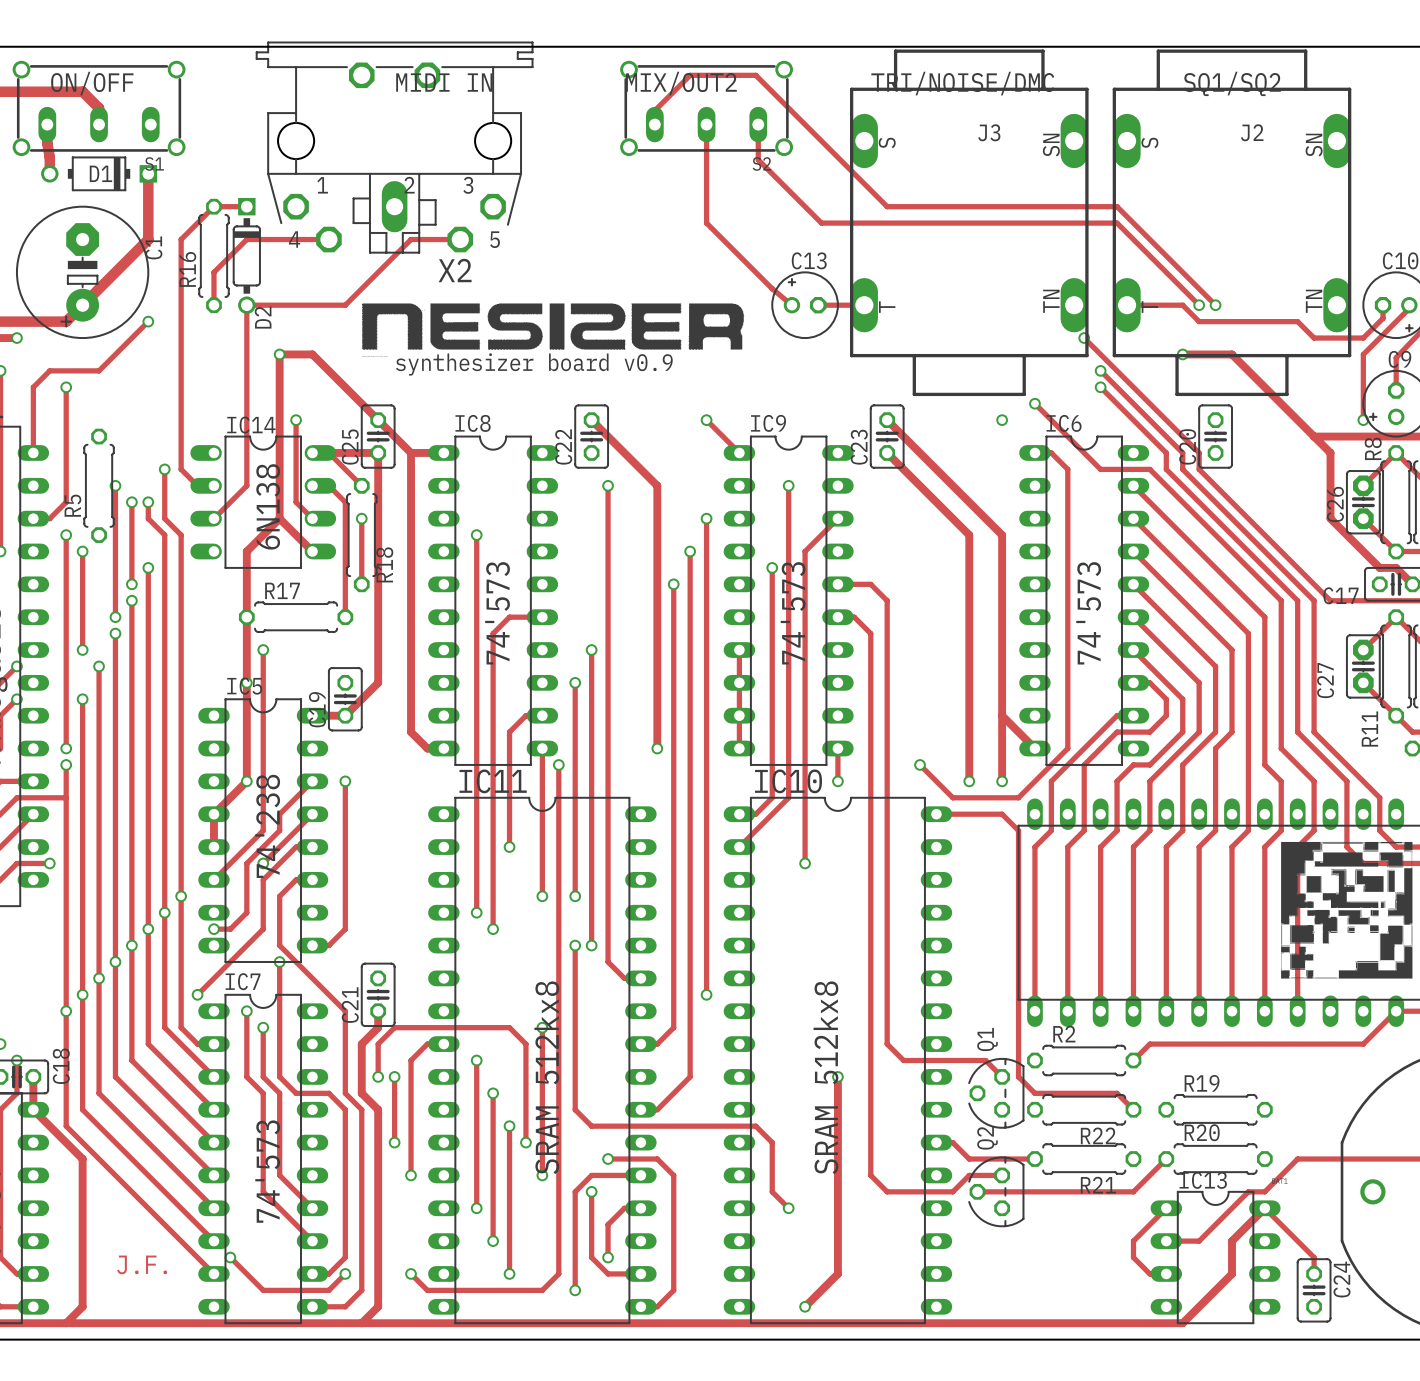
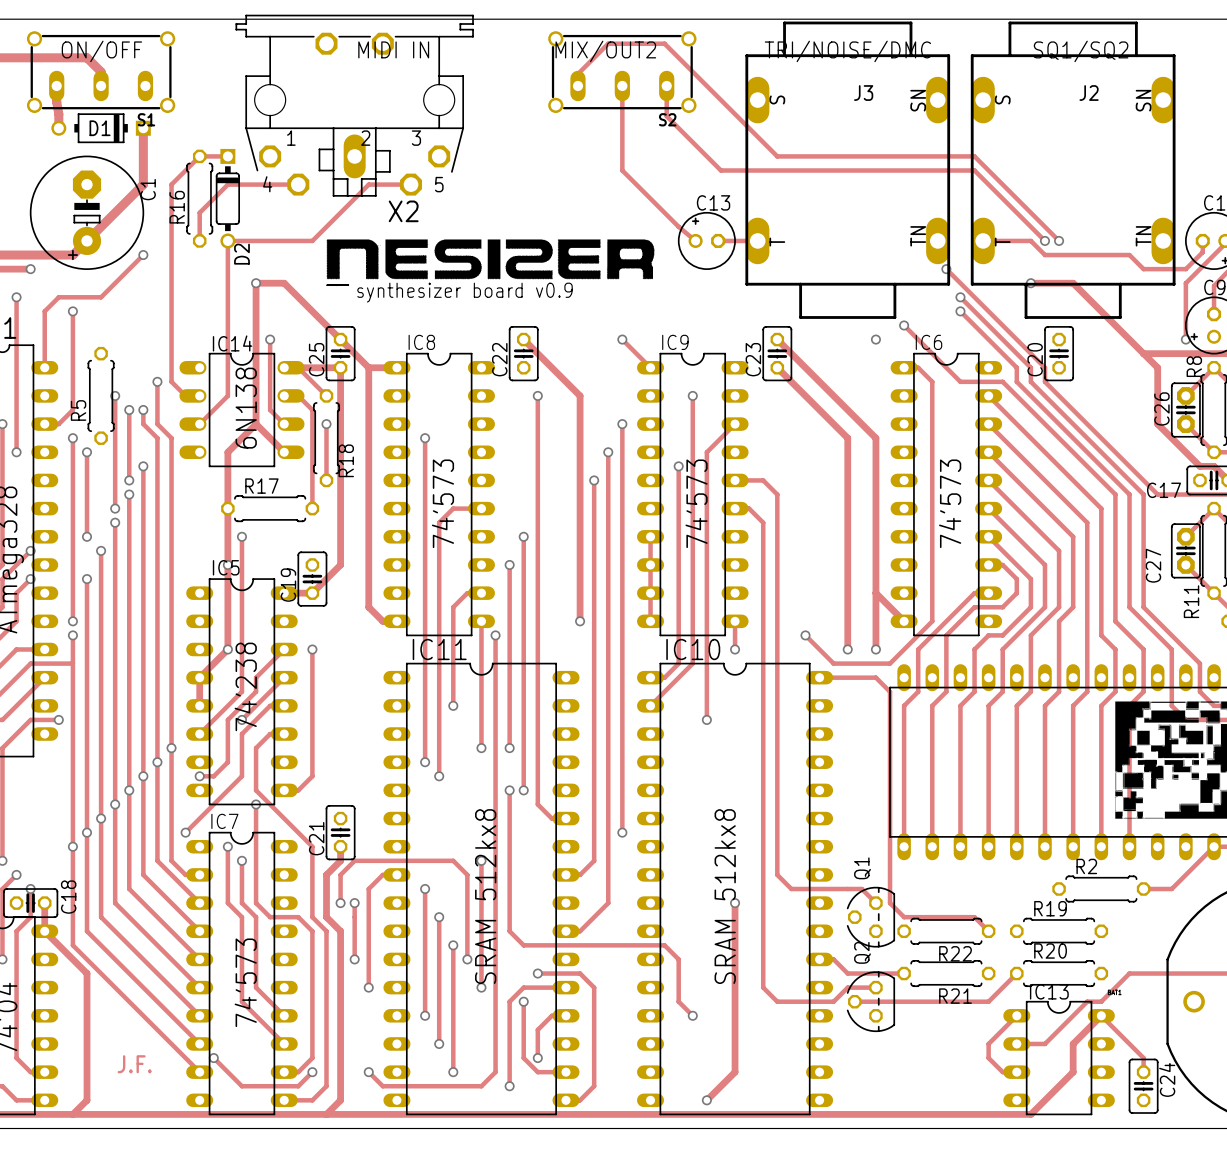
track: (1363, 1044) (1149, 1044) (1133, 1060) -> (1185, 874) (1171, 889) (1143, 889)
R2 position: (1084, 1060) -> (1101, 889)

